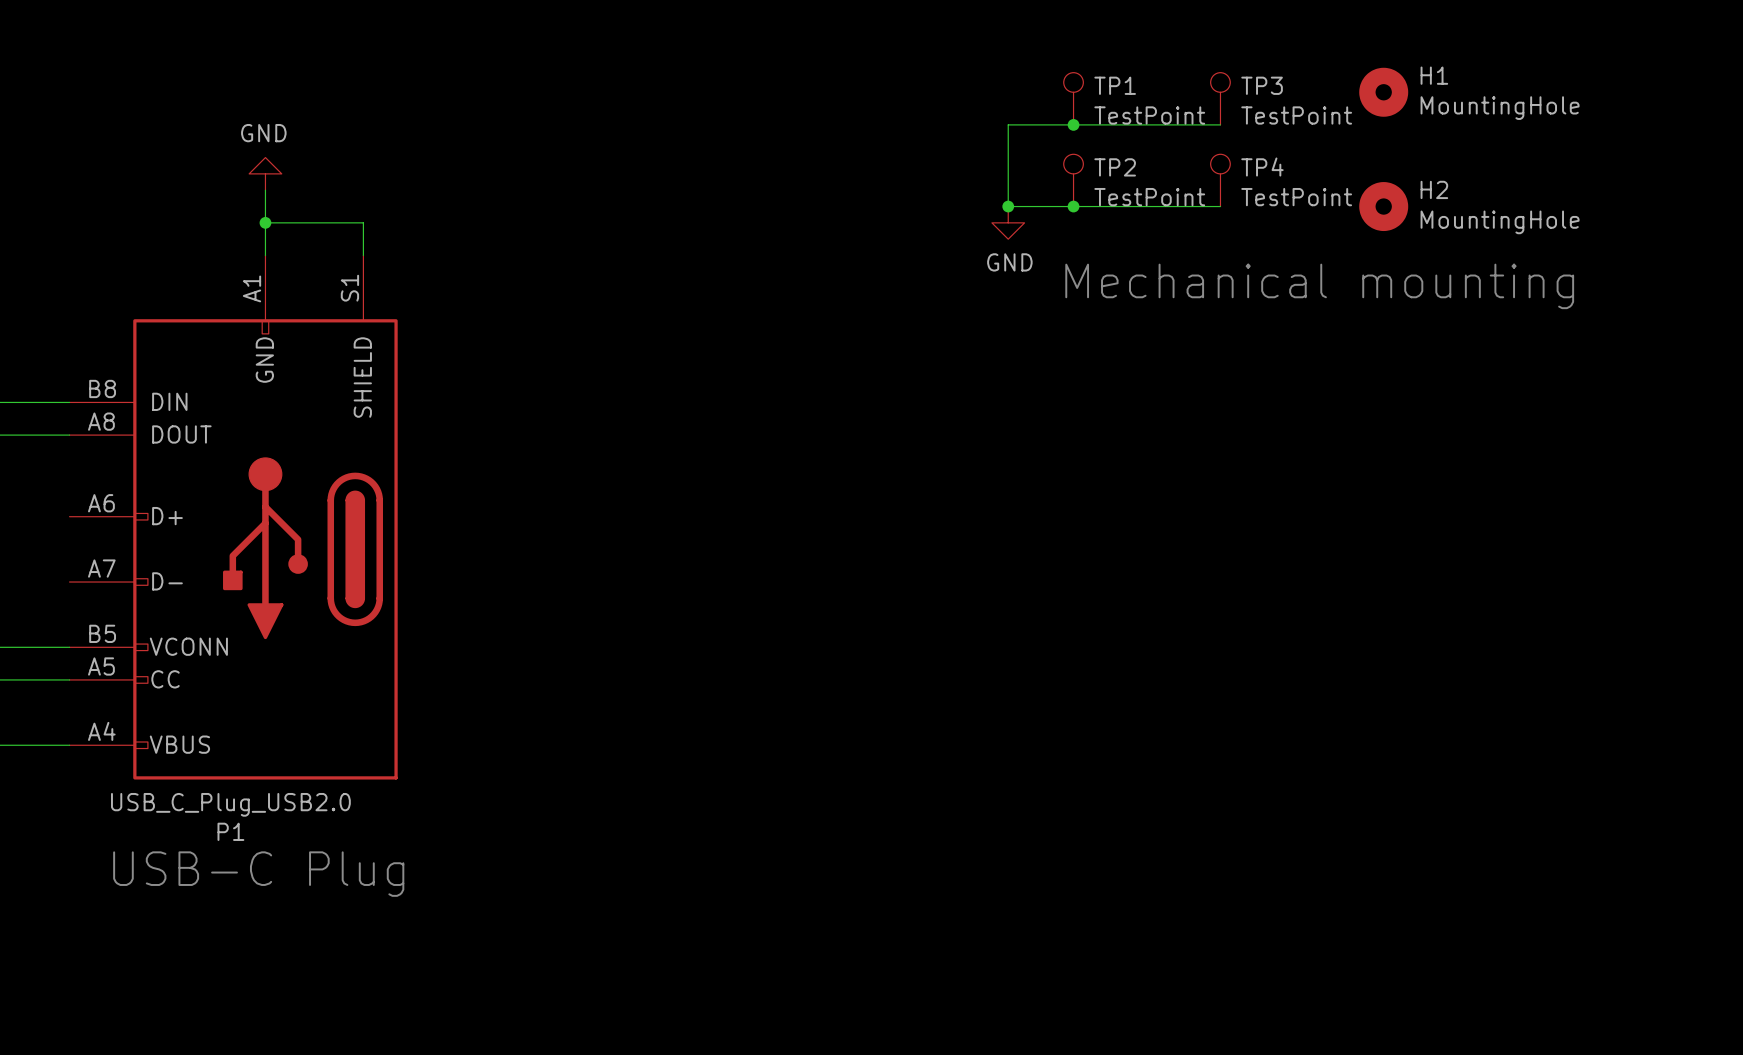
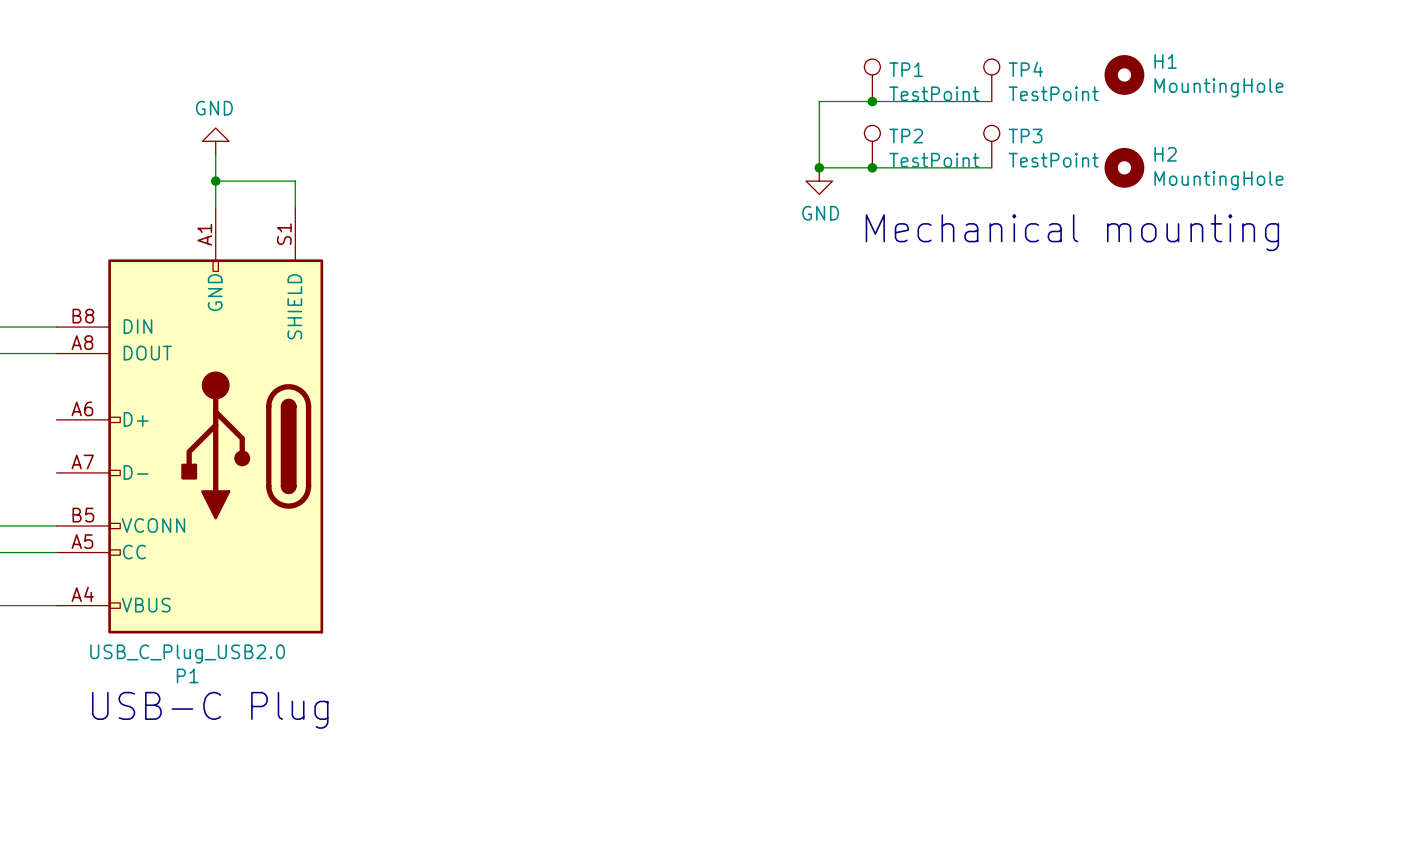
TP3 name: TP3 (1262, 85) -> TP4 (1025, 69)
TP4 name: TP4 (1262, 167) -> TP3 (1025, 136)

